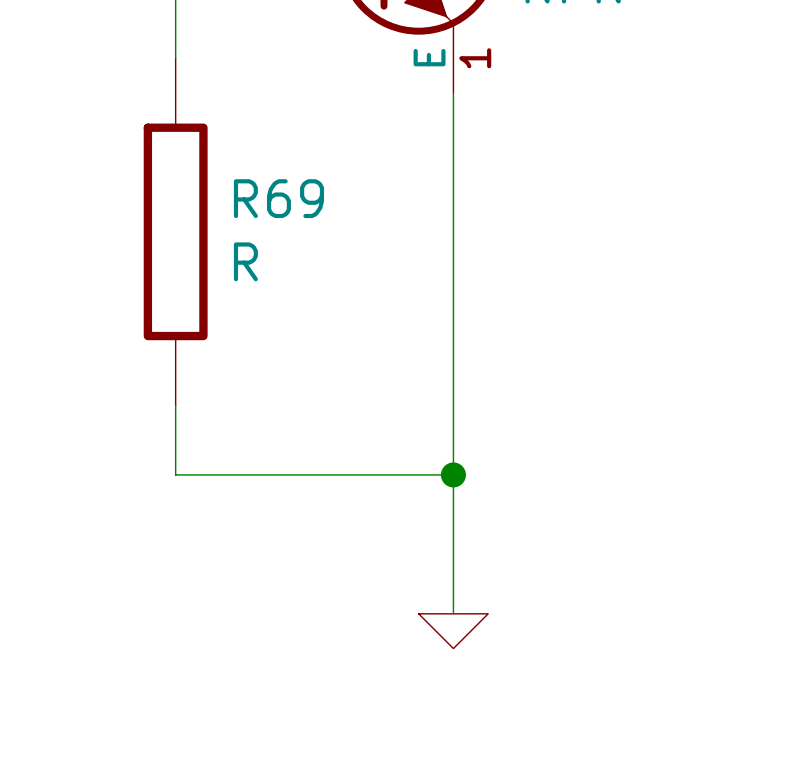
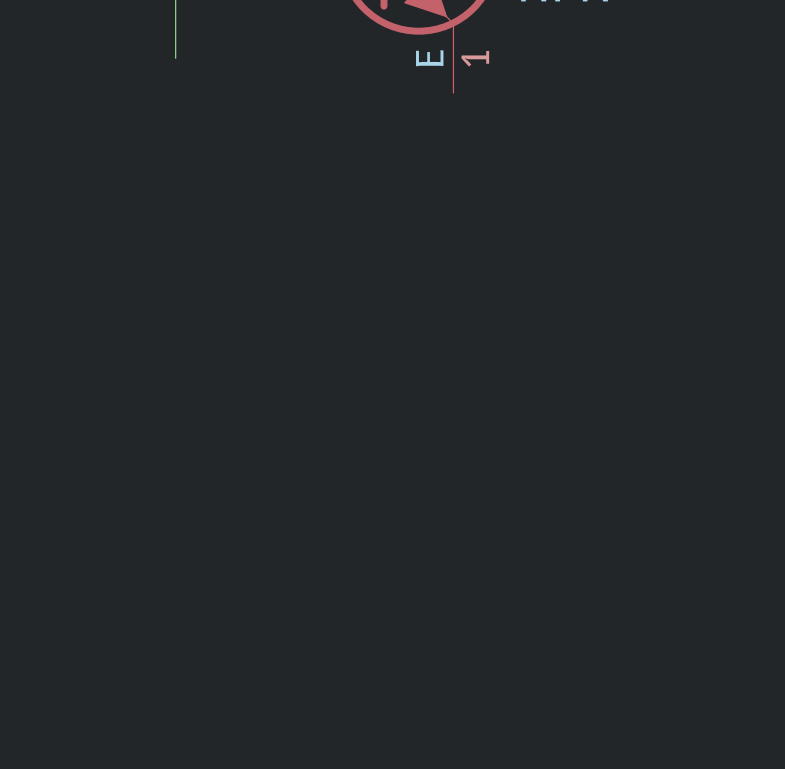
wire: (453, 93) (453, 613) -> none
R69: R (175, 231) -> none
wire: (175, 405) (175, 474) (453, 474) -> none
junction: (453, 474) -> none
power symbol: (453, 631) -> none

